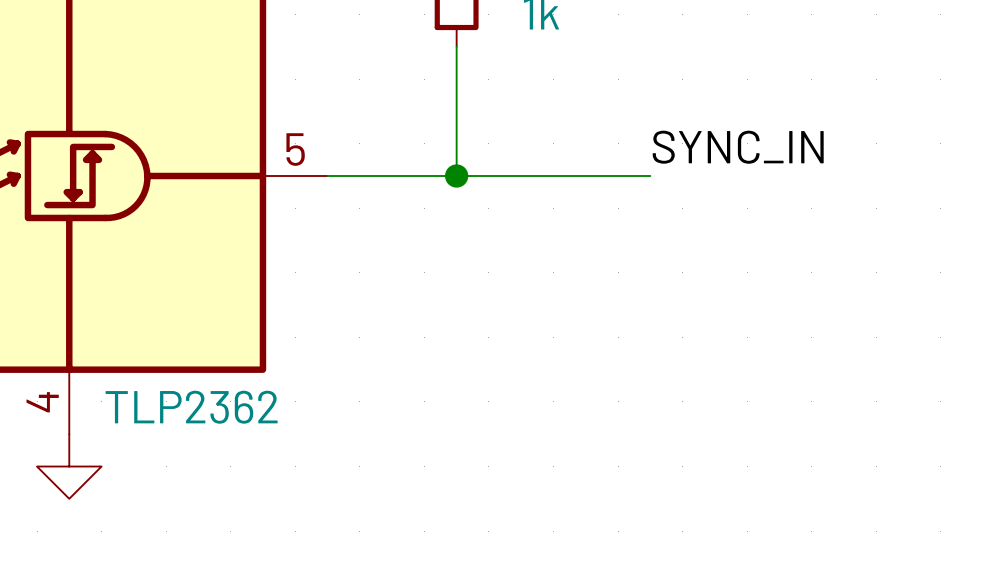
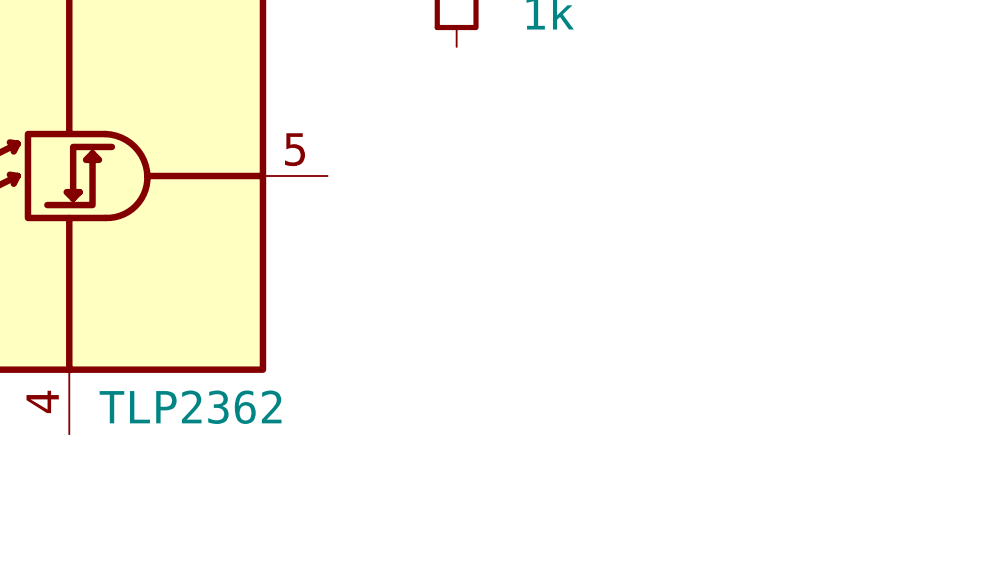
wire: (456, 46) (456, 176) -> none
label: SYNC_IN (738, 147) -> none
wire: (327, 176) (650, 176) -> none
junction: (456, 176) -> none
power symbol: (69, 466) -> none

